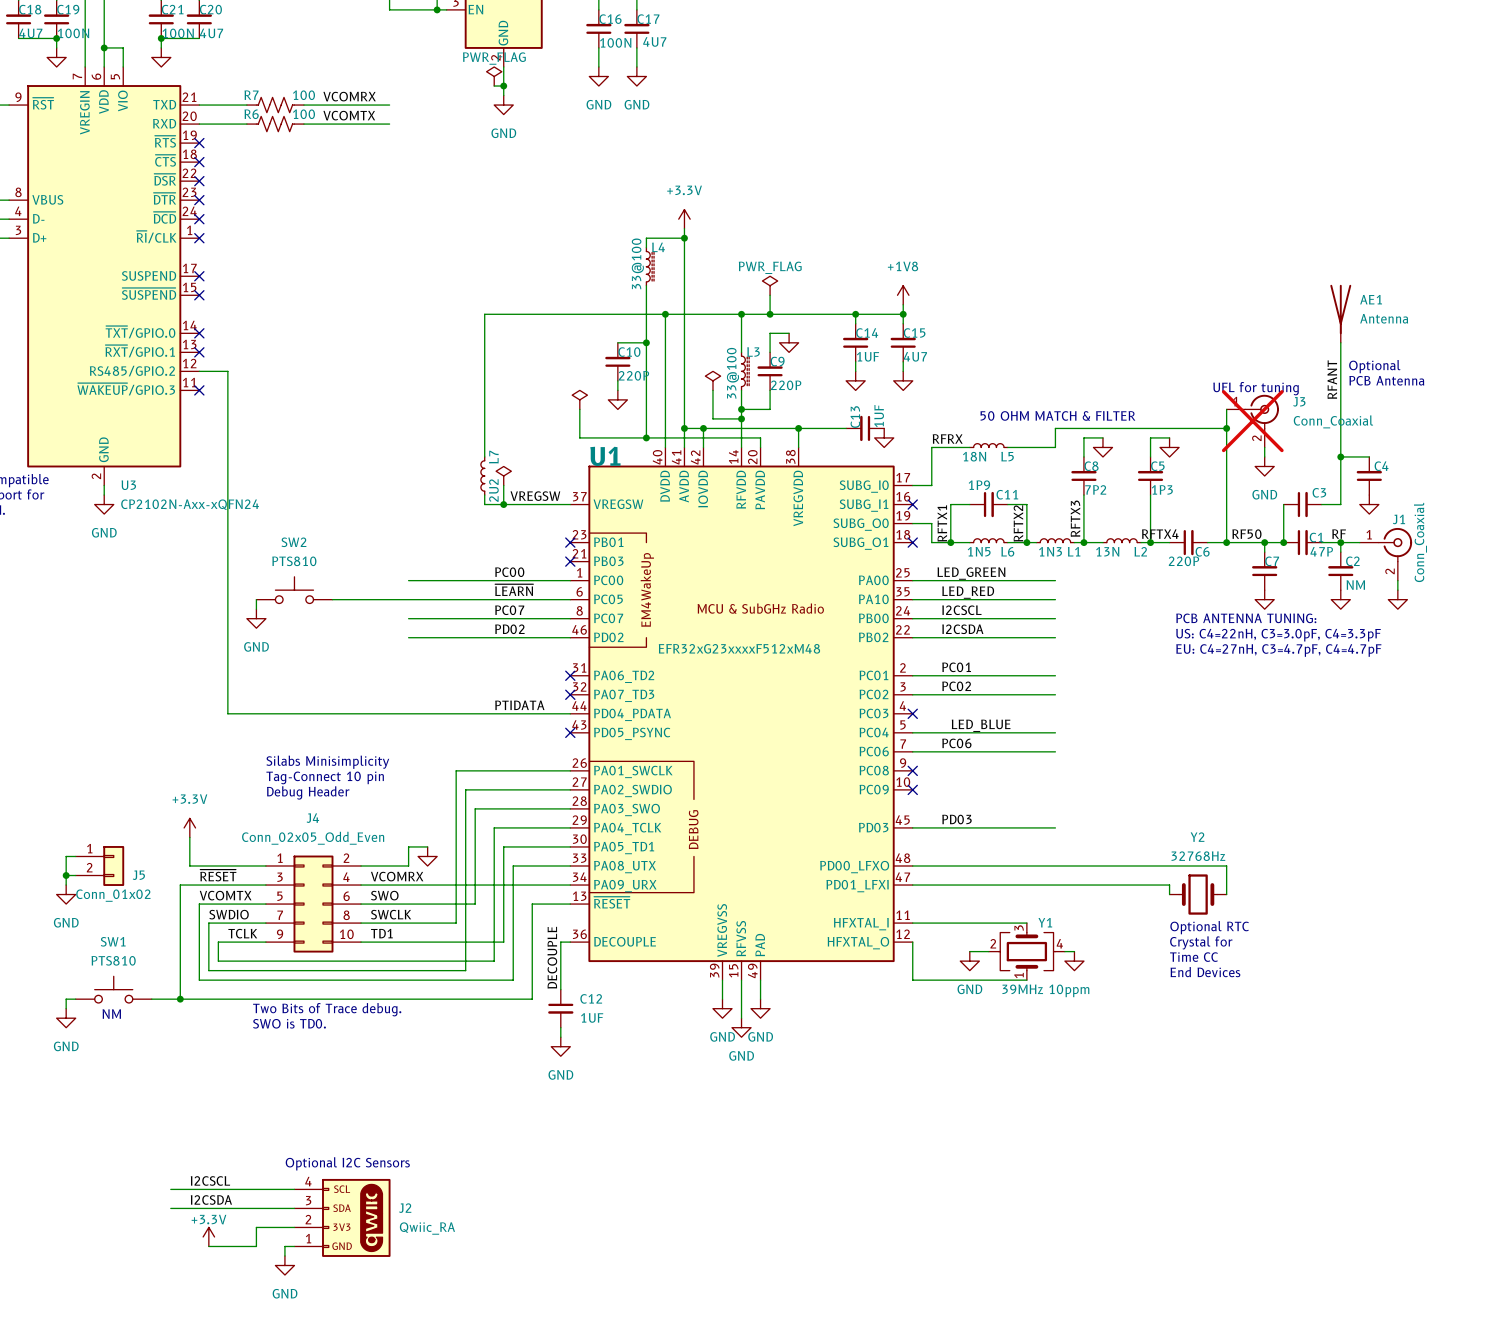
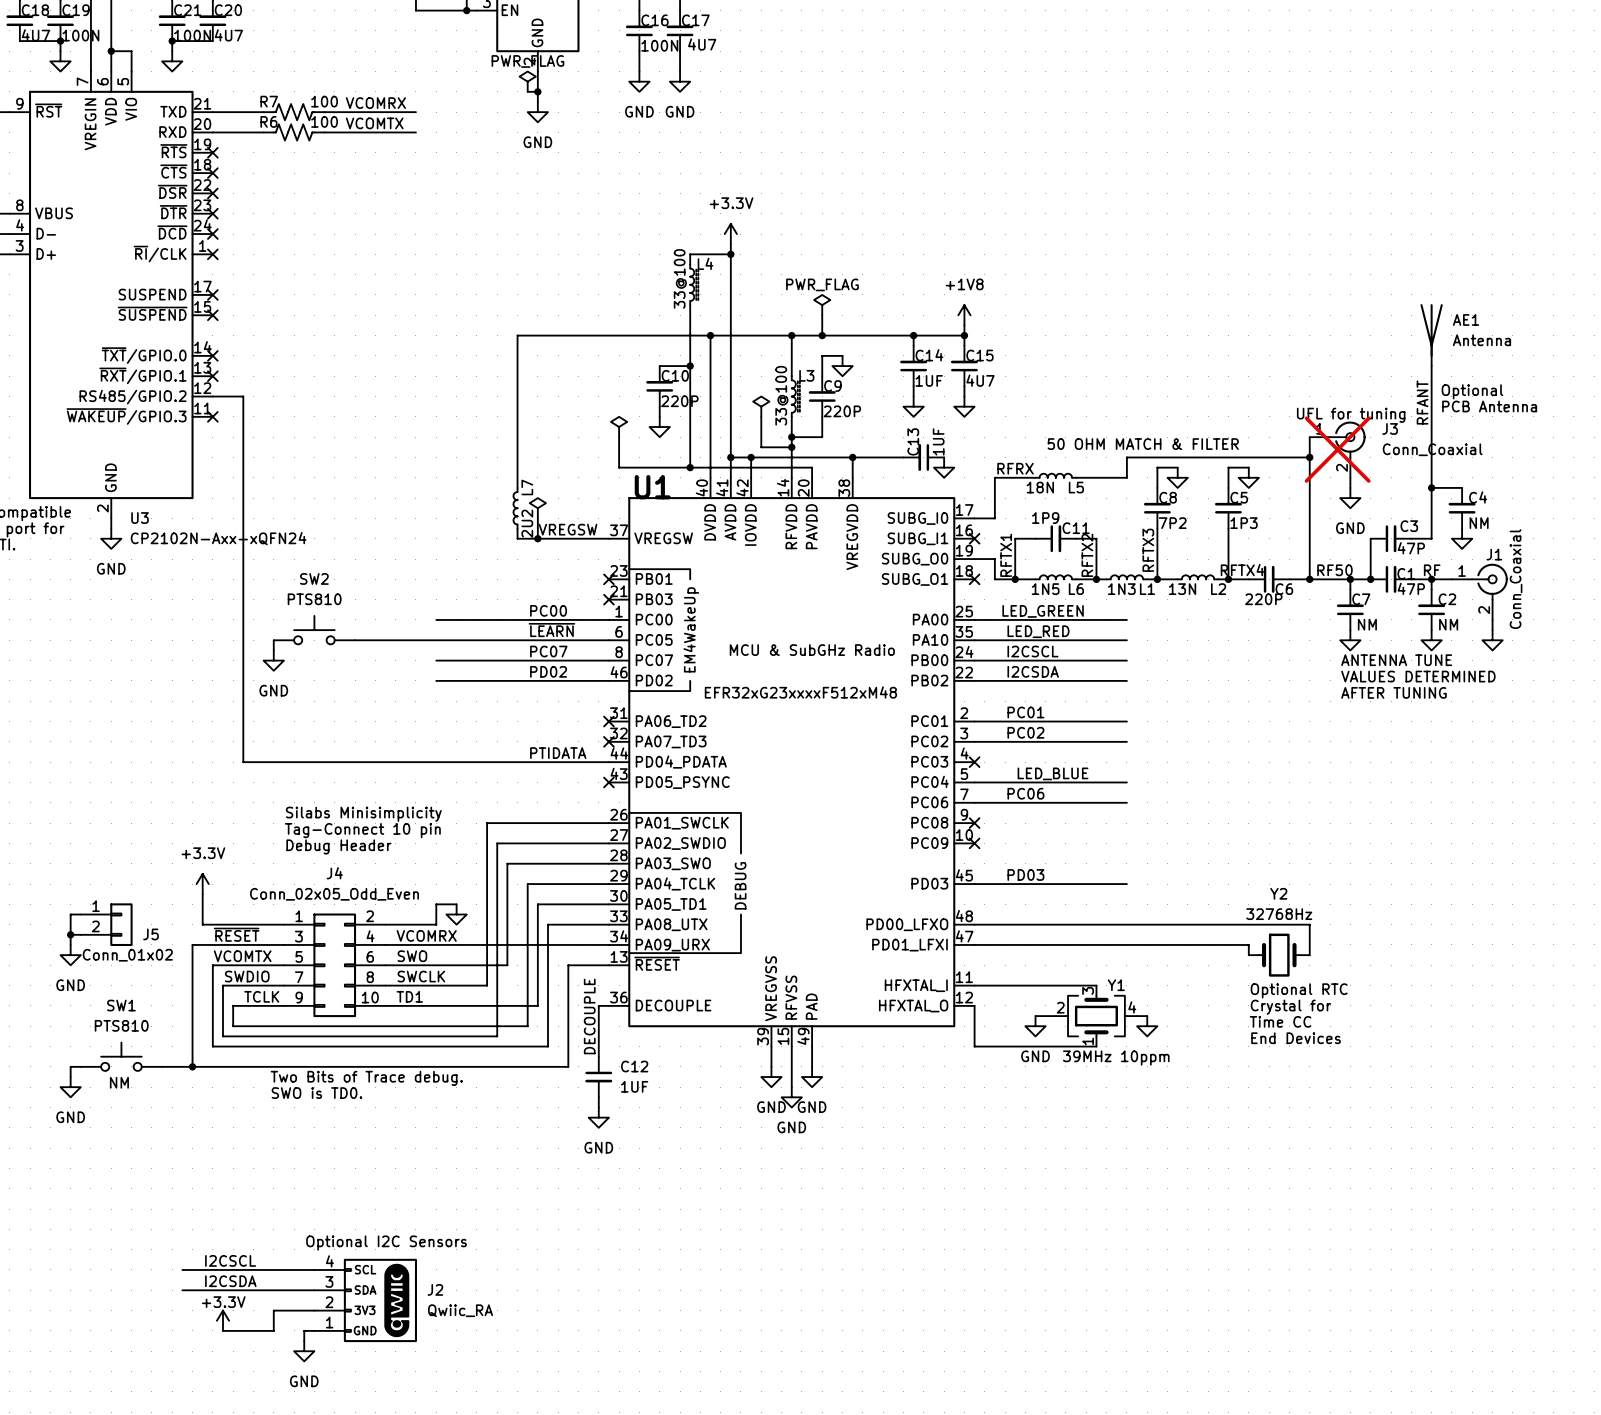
C4 value: none -> NM (1479, 523)
C3 value: none -> 47P (1411, 548)
C7 value: none -> NM (1367, 624)
text: PCB ANTENNA TUNING: (1246, 618) -> ANTENNA TUNE (1396, 660)
text: none -> VALUES DETERMINED (1418, 676)
text: US: C4=22nH, C3=3.0pF, C4=3.3pF (1278, 635) -> none
text: none -> AFTER TUNING (1393, 692)
text: EU: C4=27nH, C3=4.7pF, C4=4.7pF (1278, 650) -> none

